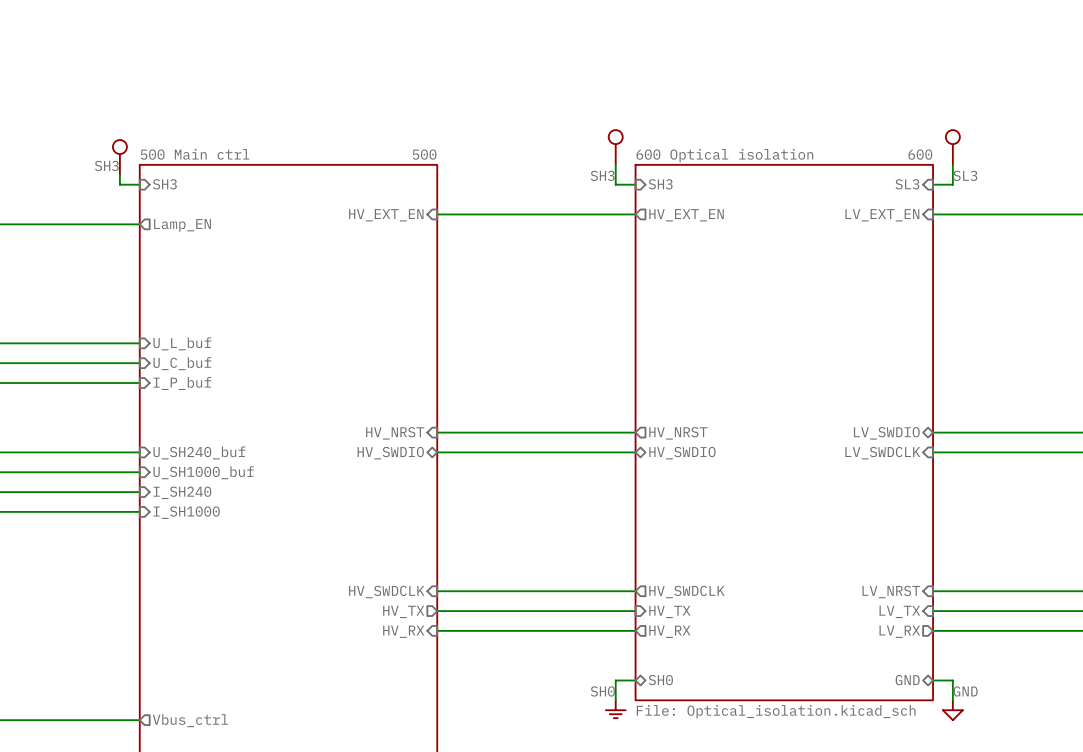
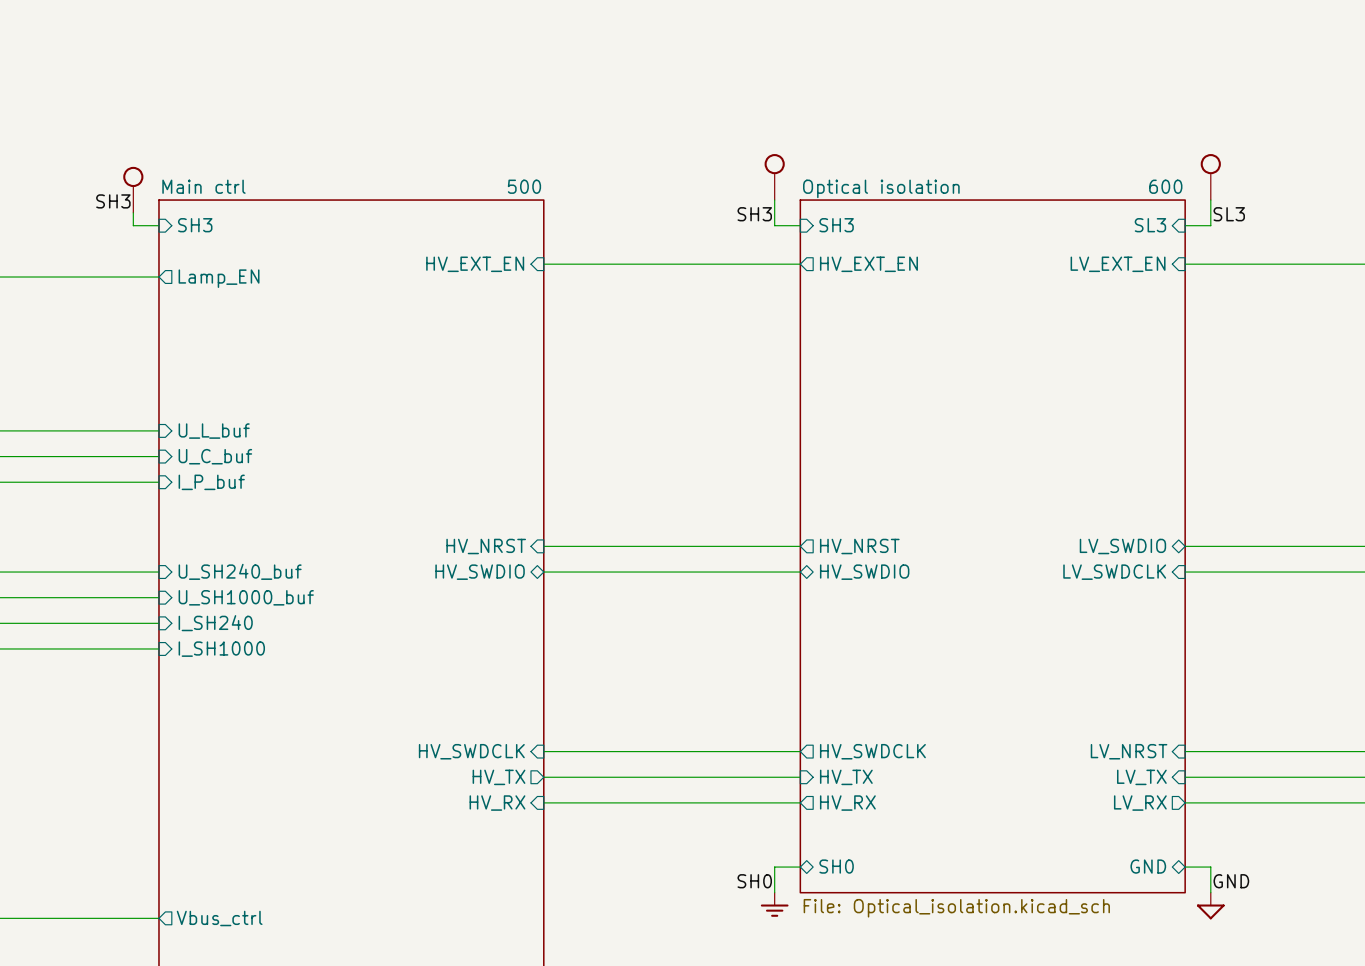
sheet 500 Main ctrl name: 500 Main ctrl (195, 154) -> Main ctrl (203, 186)
sheet 600 Optical isolation name: 600 Optical isolation (724, 155) -> Optical isolation (881, 188)

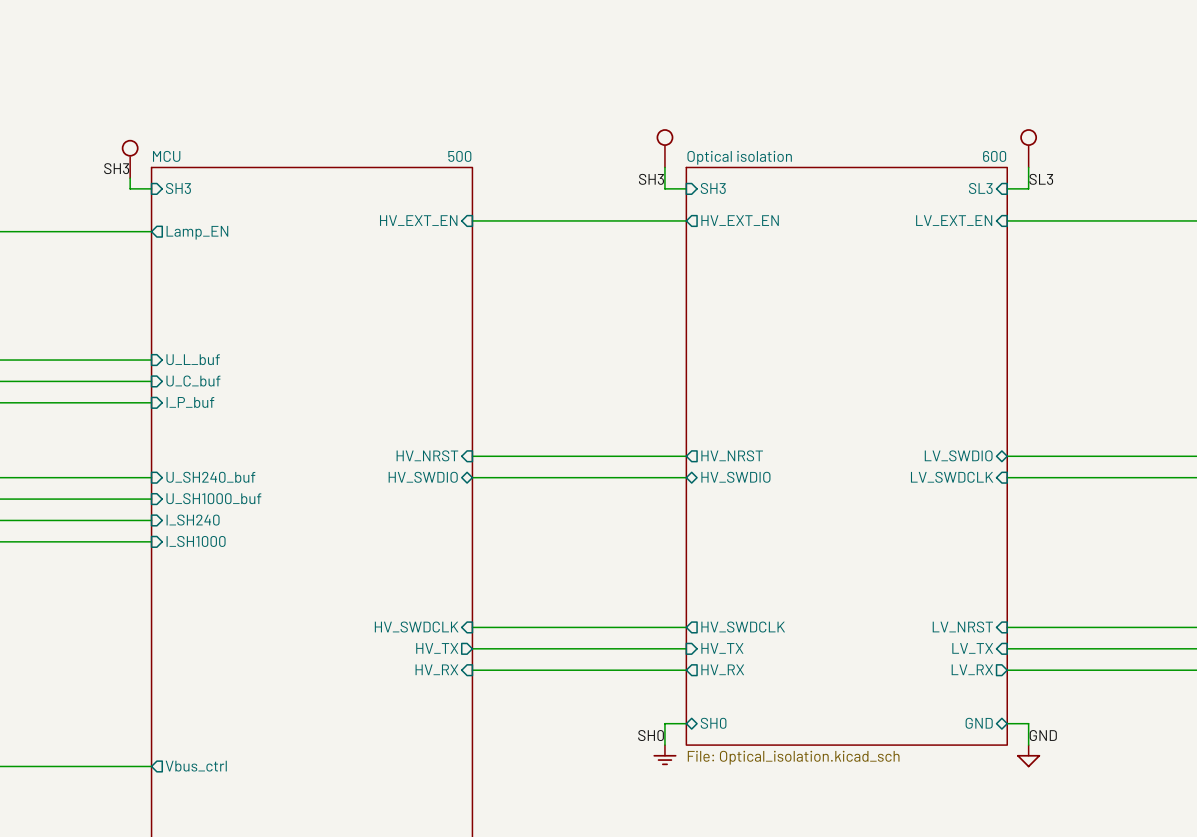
sheet Main ctrl name: Main ctrl (203, 186) -> MCU (166, 156)

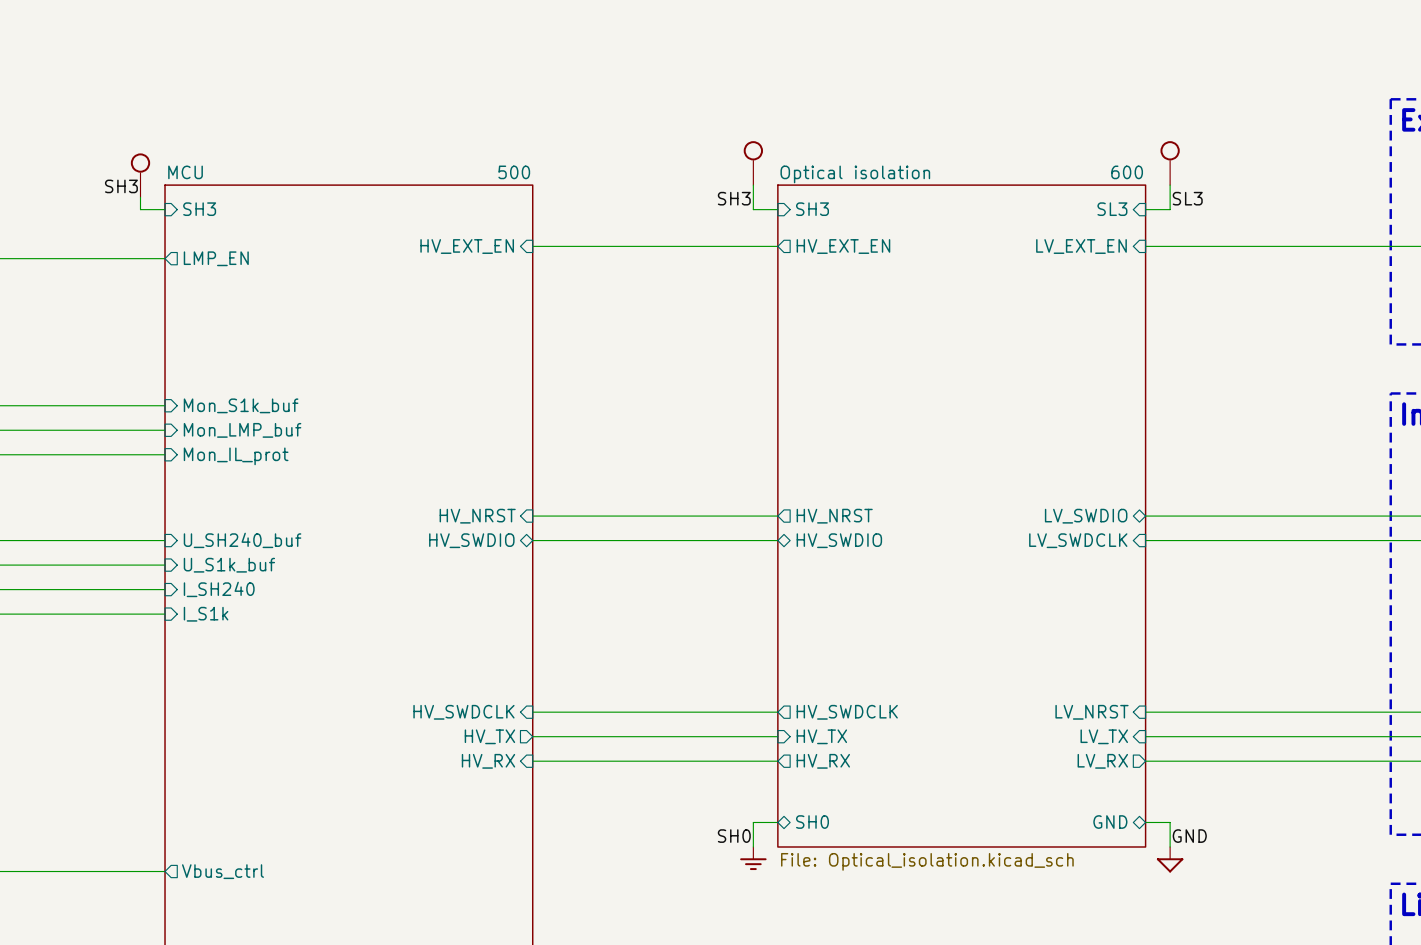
sheet pin: Lamp_EN (197, 232) -> LMP_EN (216, 258)
sheet pin: U_L_buf (193, 359) -> Mon_S1k_buf (241, 405)
sheet pin: U_C_buf (193, 381) -> Mon_LMP_buf (242, 430)
sheet pin: I_P_buf (190, 402) -> Mon_IL_prot (236, 456)
sheet pin: U_SH1000_buf (213, 498) -> U_S1k_buf (229, 565)
sheet pin: I_SH1000 (196, 541) -> I_S1k (206, 614)

